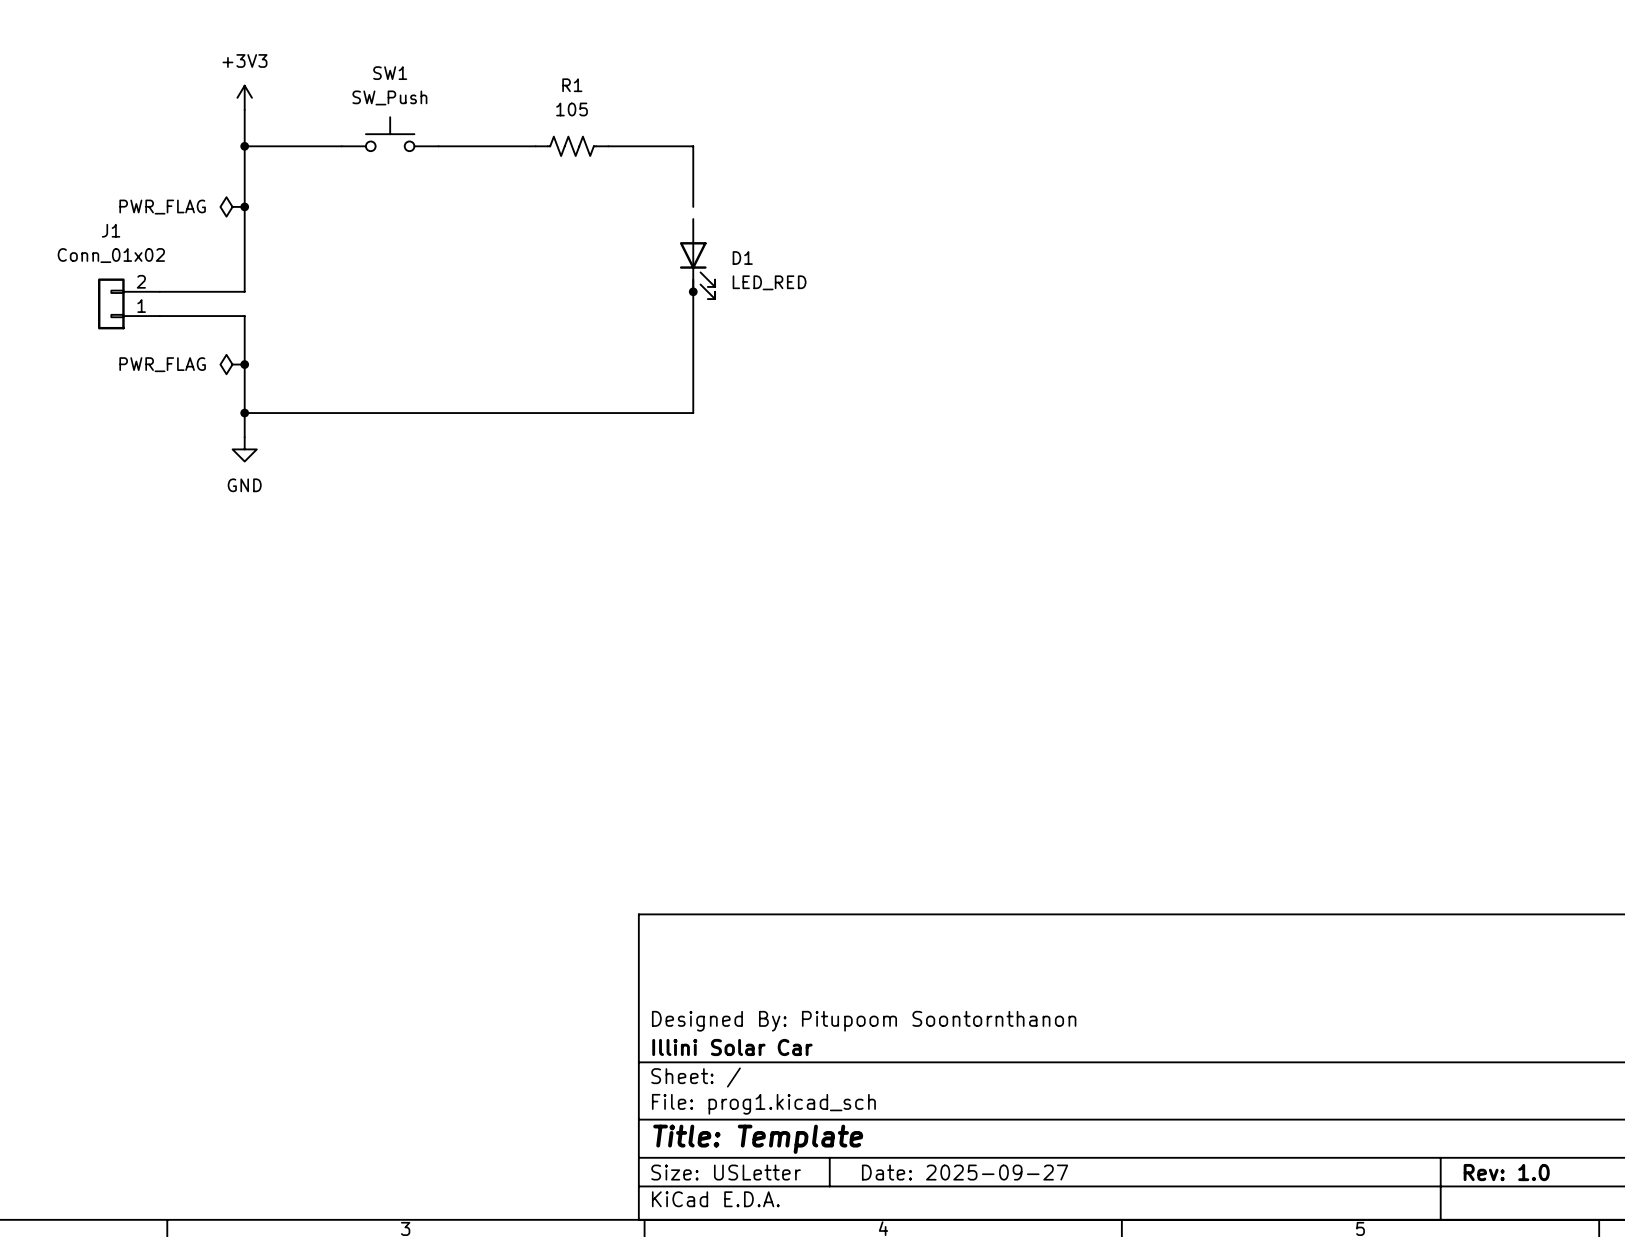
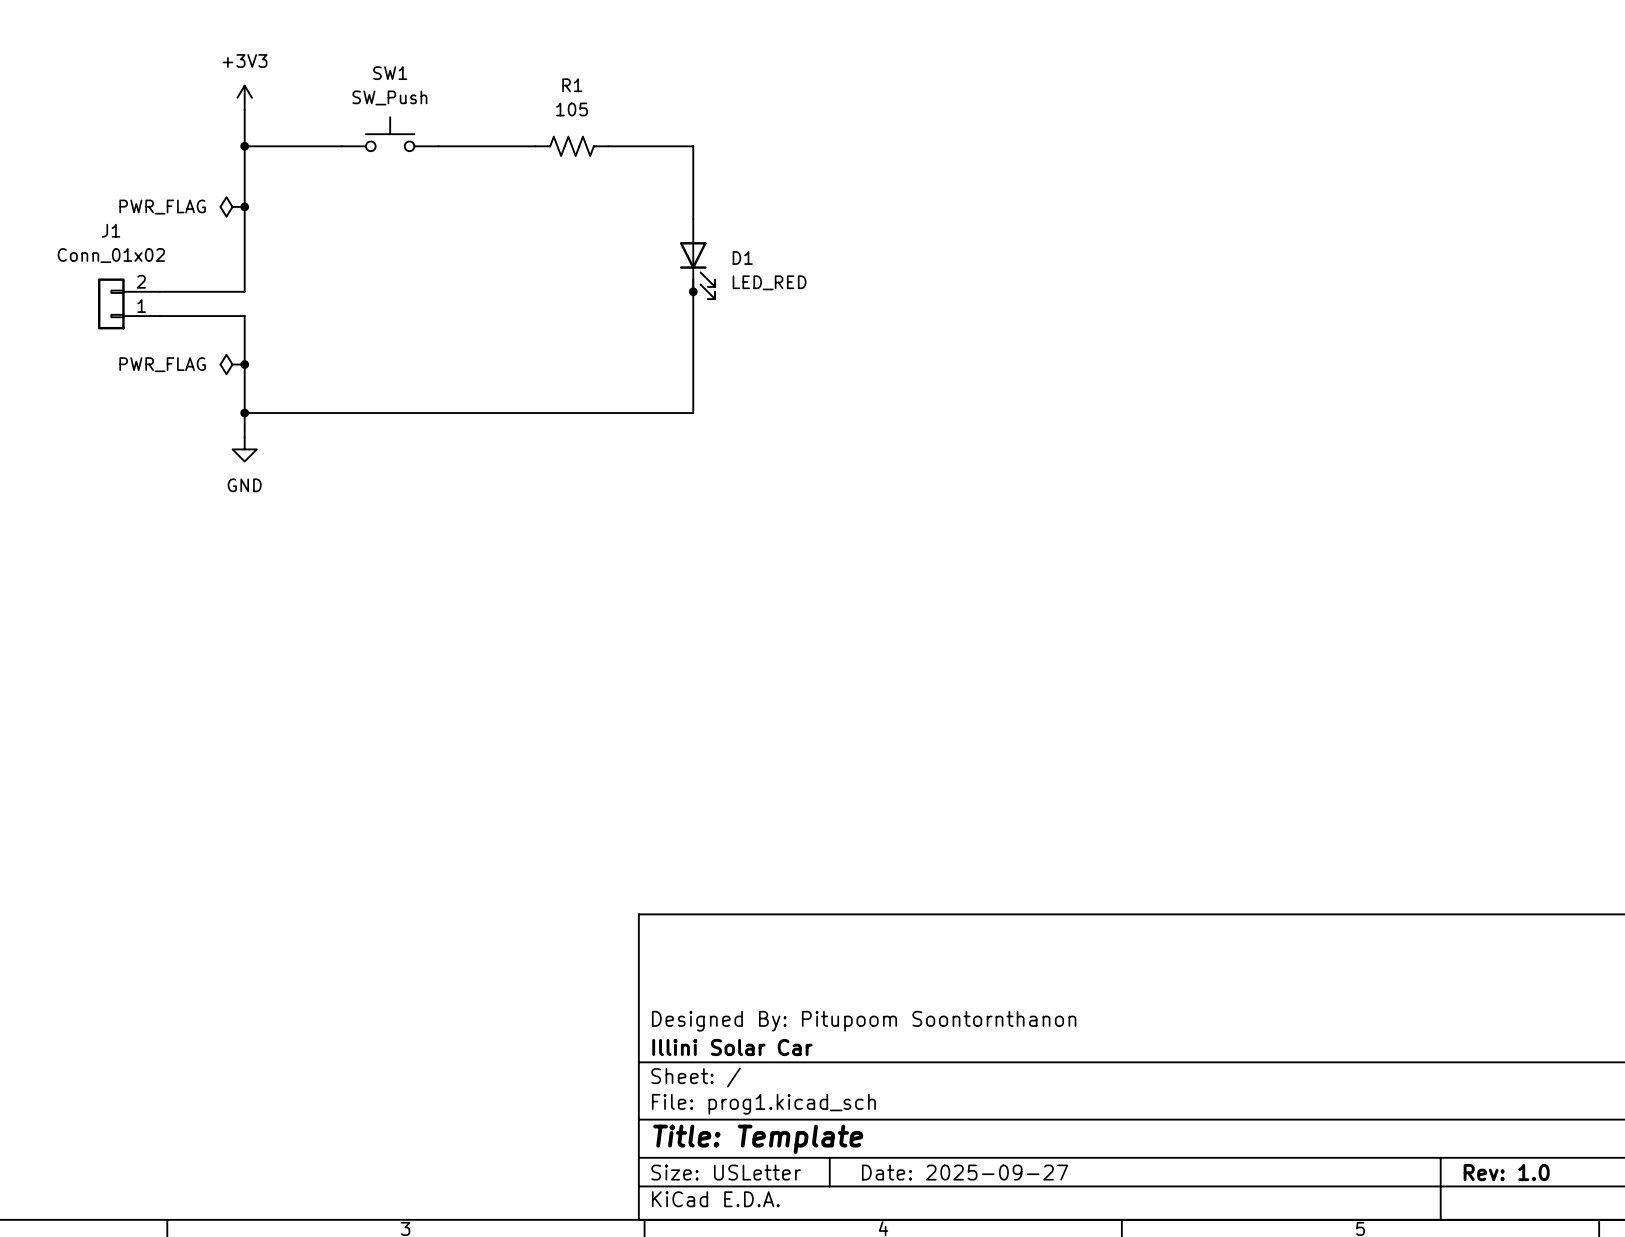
wire: none -> (693, 206) (693, 219)

